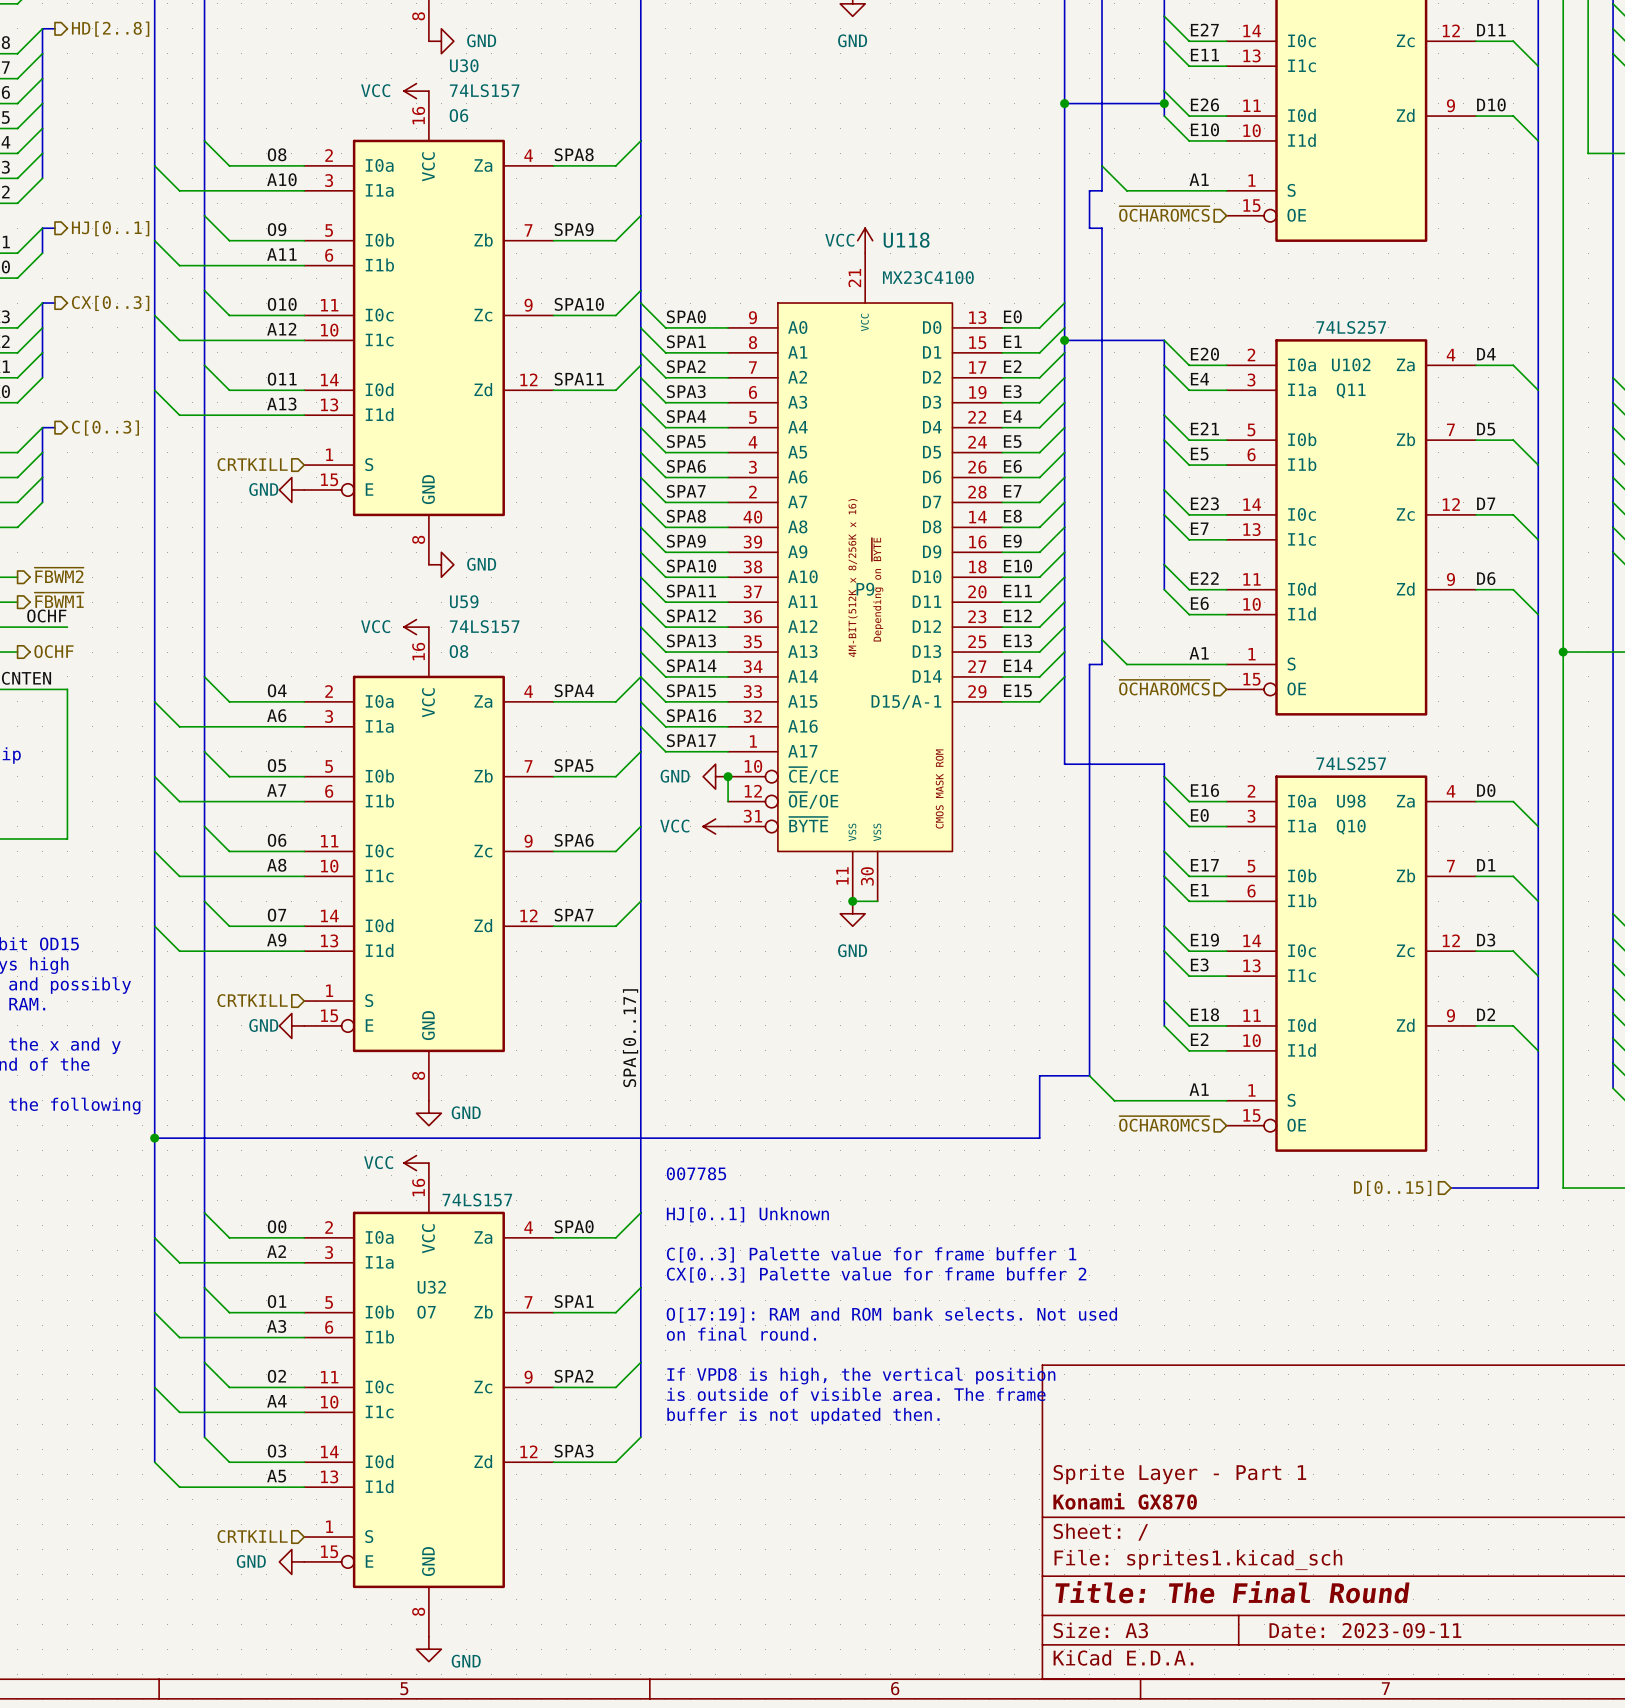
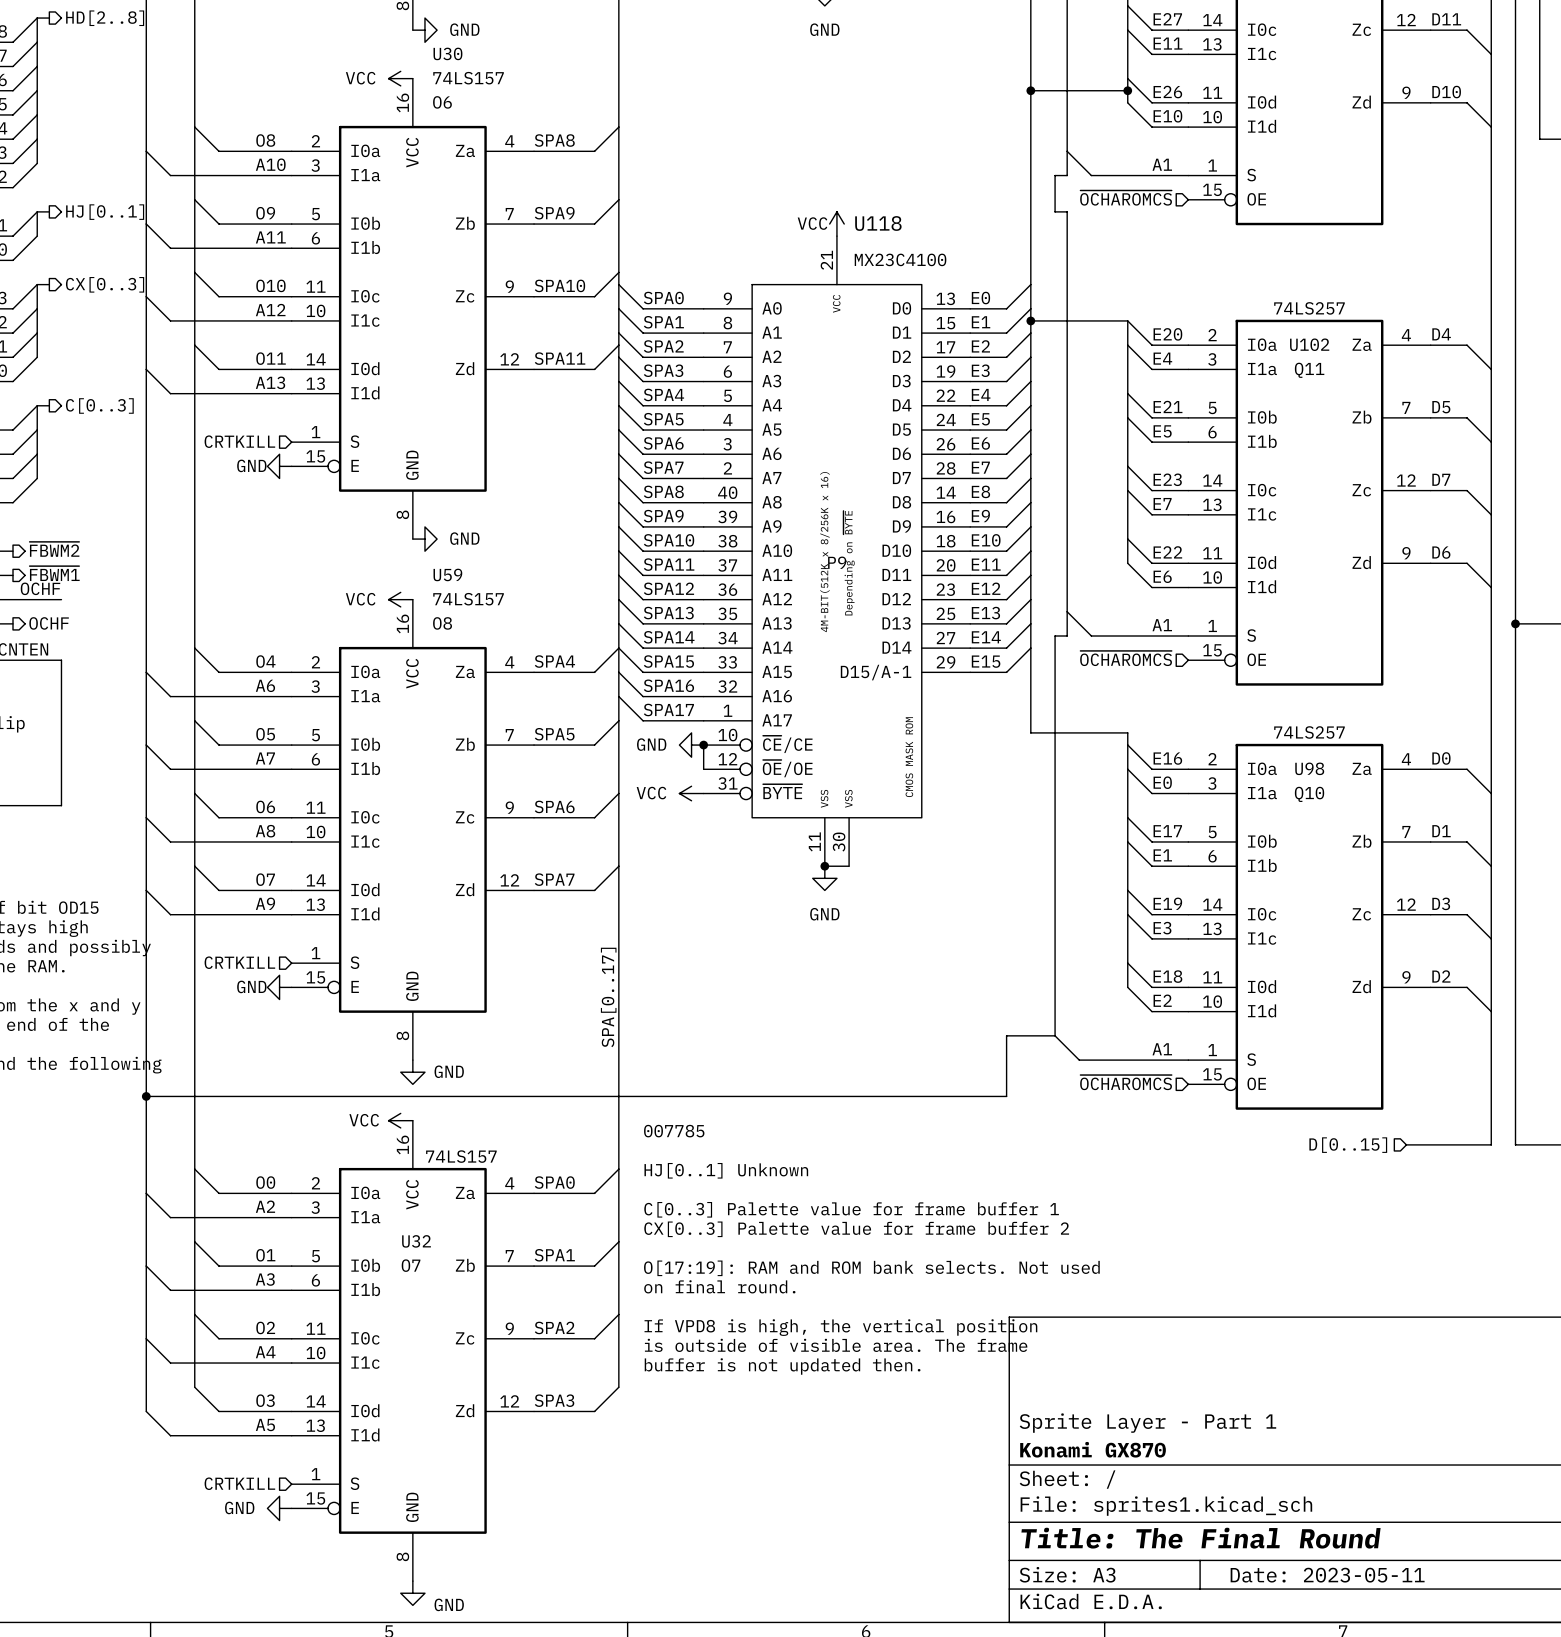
title block: Date: 2023-09-11 (1365, 1630) -> Date: 2023-05-11 (1327, 1575)

